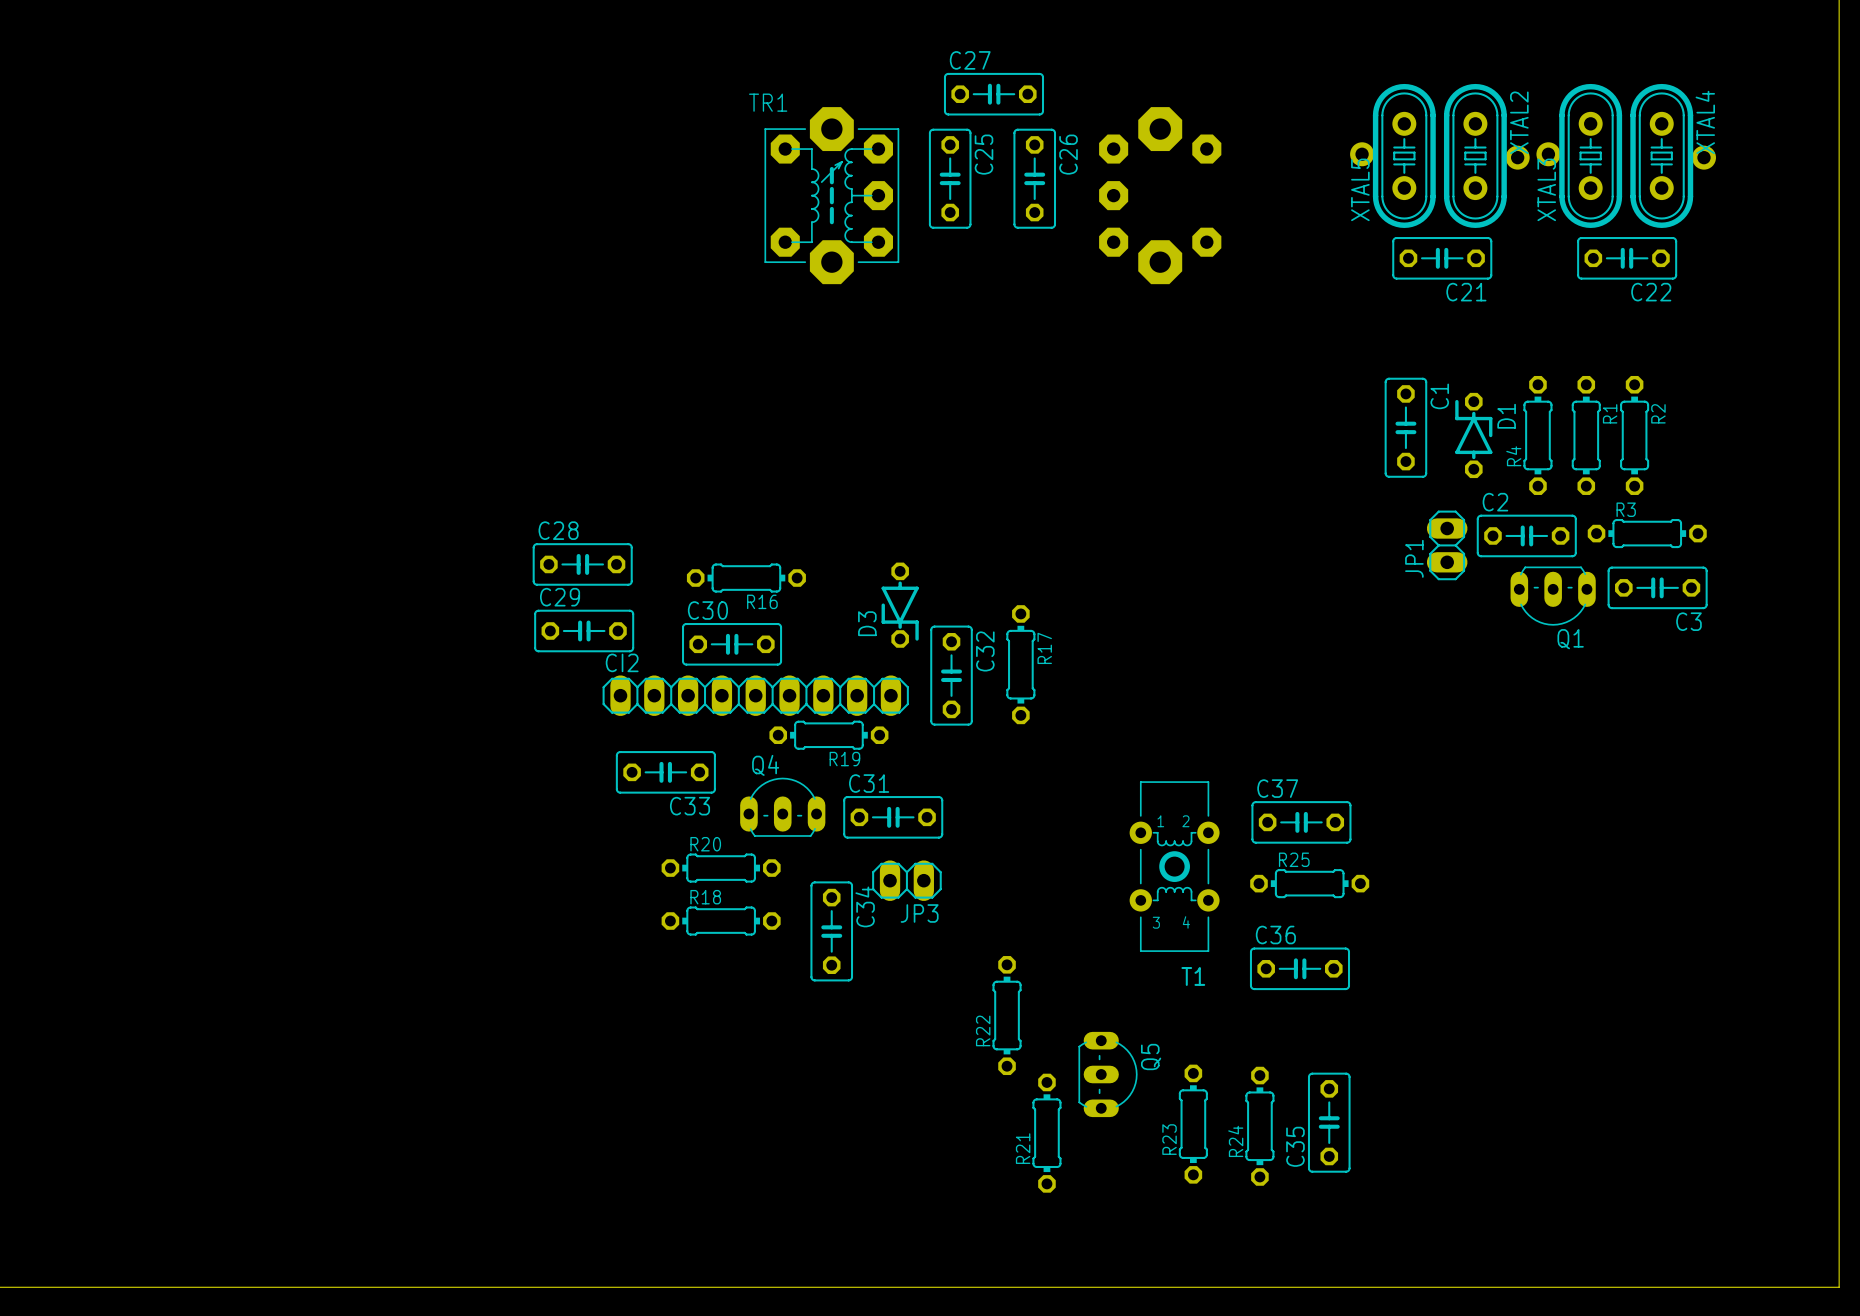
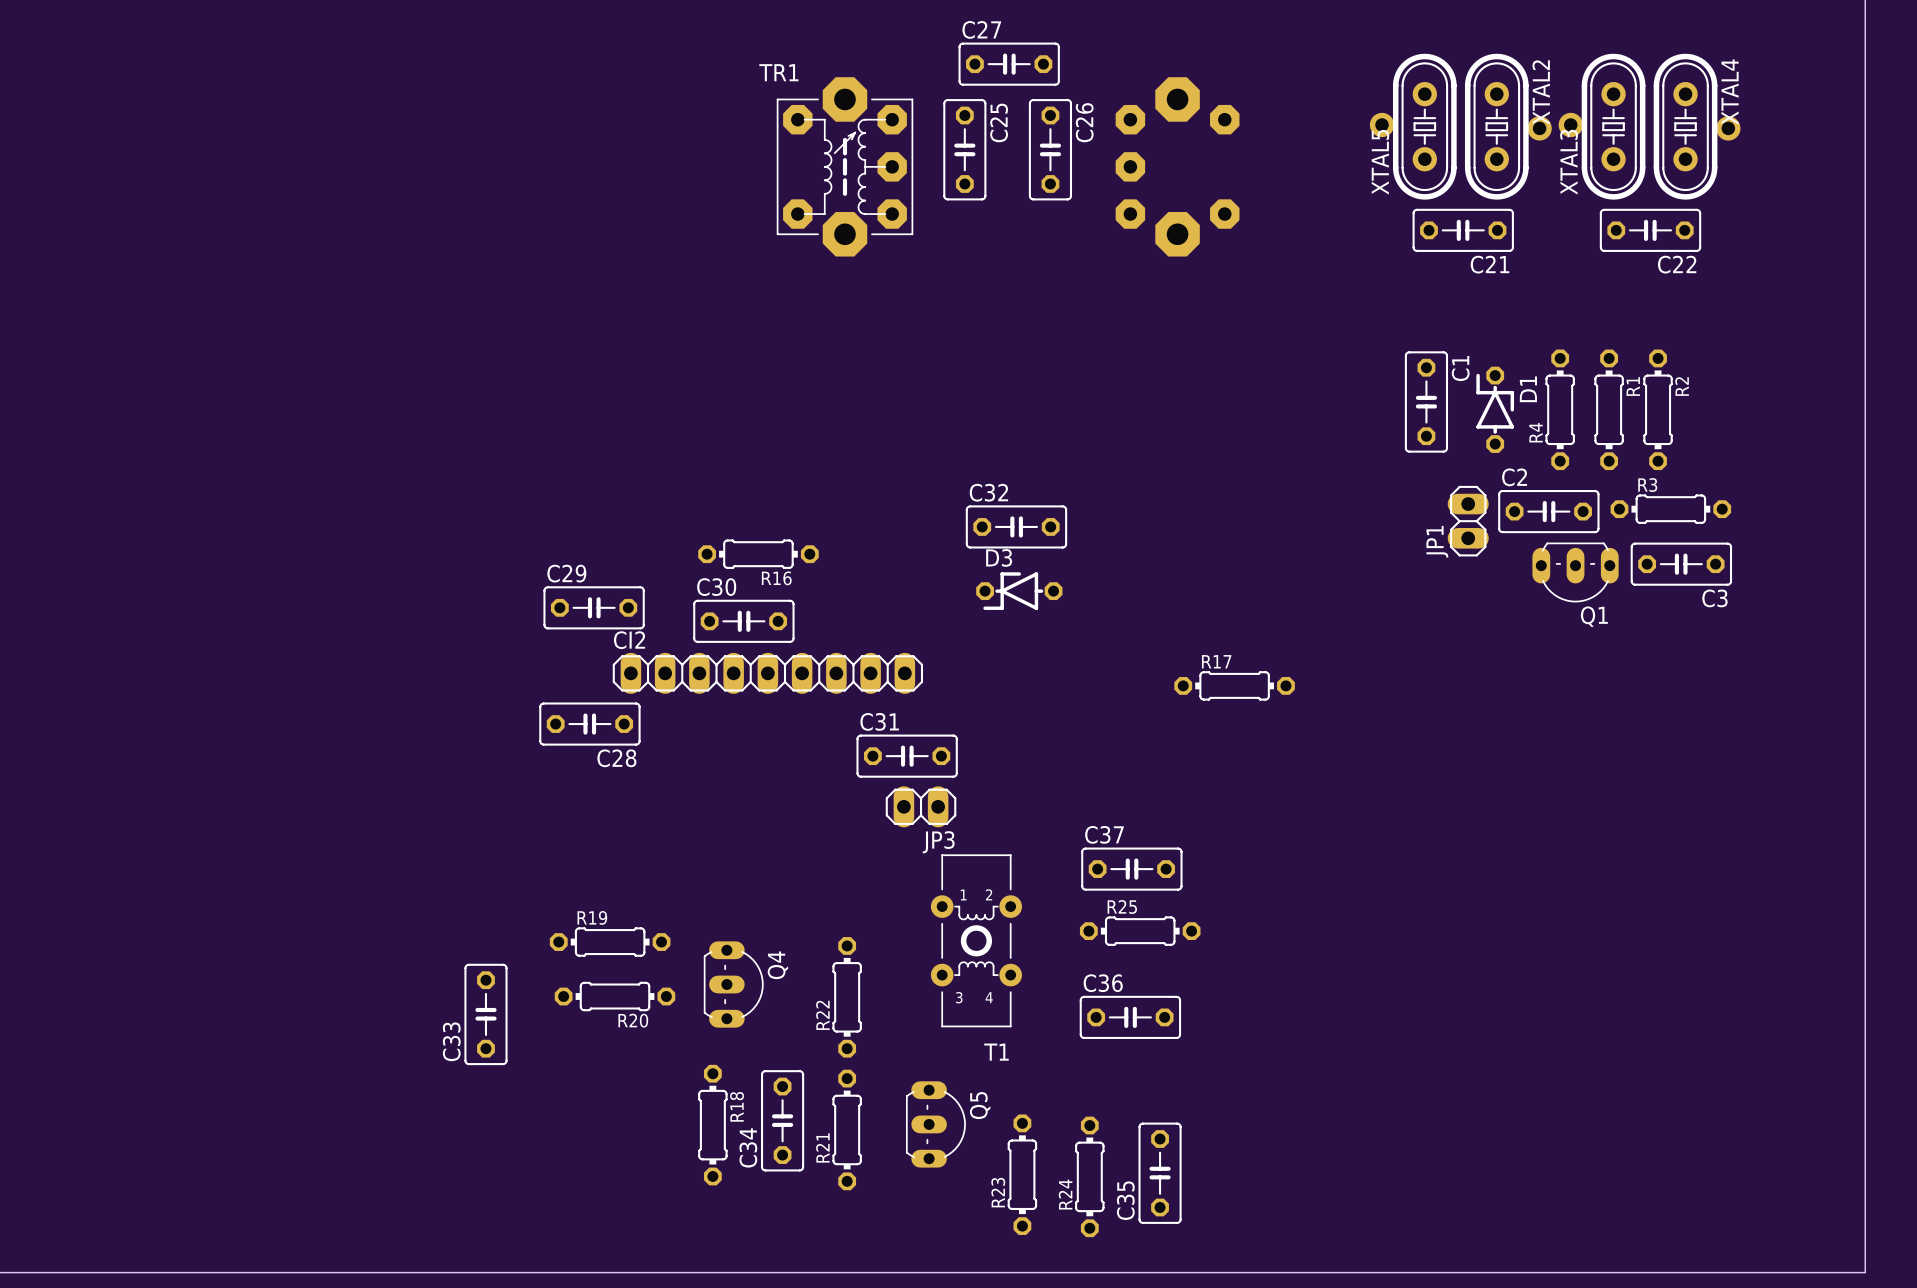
C28 rotation: 0° (582, 564) -> 180° (589, 724)
C28 position: (582, 564) -> (589, 724)
D3 rotation: 0° (900, 605) -> 90° clockwise (1019, 591)
D3 position: (900, 605) -> (1019, 591)
R17 name position: R17 (1044, 648) -> R17 (1216, 661)
R17 rotation: 0° (1020, 664) -> 90° clockwise (1234, 685)
R17 position: (1020, 664) -> (1234, 685)
C32 rotation: 0° (951, 675) -> 90° counterclockwise (1016, 526)
C32 position: (951, 675) -> (1016, 526)
R19 position: (828, 735) -> (610, 942)
R19 name position: R19 (844, 759) -> R19 (592, 917)
C33 rotation: 0° (665, 772) -> 90° clockwise (485, 1014)
C33 position: (665, 772) -> (485, 1014)
Q4 rotation: 0° (782, 807) -> 90° clockwise (733, 984)
Q4 position: (782, 807) -> (733, 984)
C31 position: (893, 817) -> (907, 756)
C37 position: (1301, 822) -> (1131, 869)
R20 name position: R20 (705, 844) -> R20 (633, 1020)
T1 position: (1174, 866) -> (976, 940)
R20 position: (721, 868) -> (615, 996)
JP3 position: (906, 880) -> (921, 806)
R25 position: (1309, 883) -> (1140, 931)
R18 rotation: 0° (721, 921) -> 90° clockwise (712, 1125)
R18 position: (721, 921) -> (712, 1125)
C34 rotation: 0° (831, 931) -> 180° (782, 1120)
C34 position: (831, 931) -> (782, 1120)
C36 position: (1299, 968) -> (1130, 1017)
R22 position: (1007, 1015) -> (847, 997)
Q5 position: (1108, 1074) -> (935, 1124)
C35 position: (1329, 1122) -> (1160, 1173)
R23 position: (1193, 1124) -> (1022, 1174)
R24 position: (1259, 1126) -> (1089, 1176)
R21 position: (1046, 1133) -> (847, 1129)

